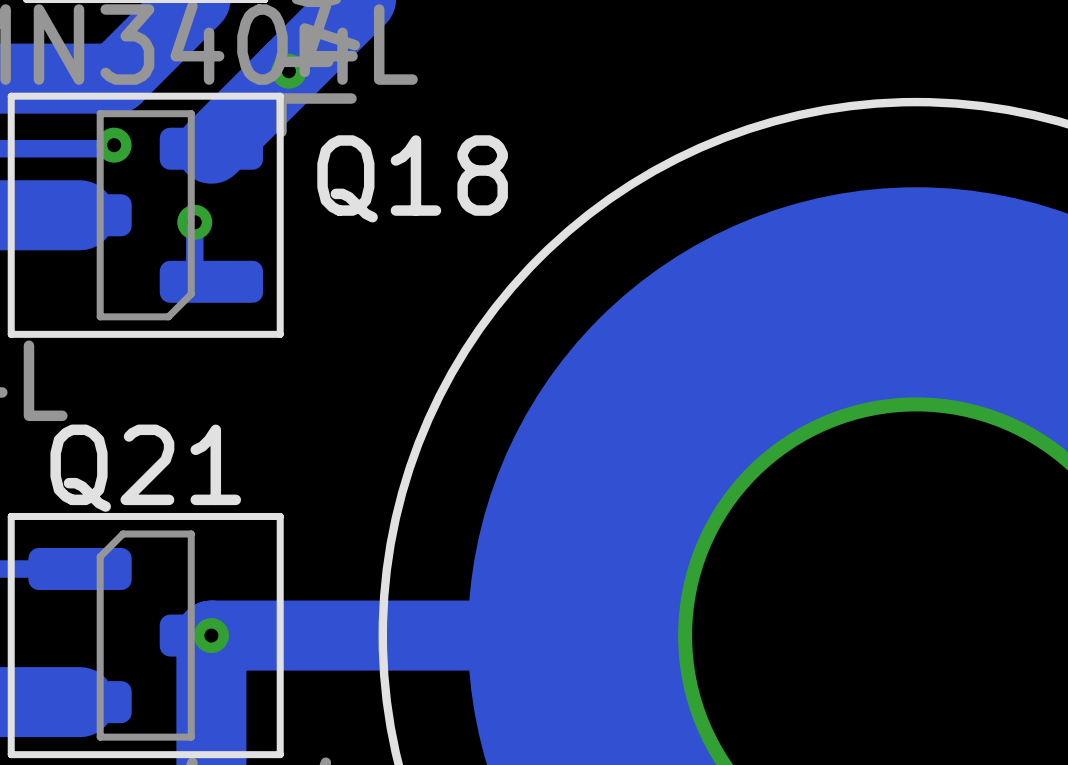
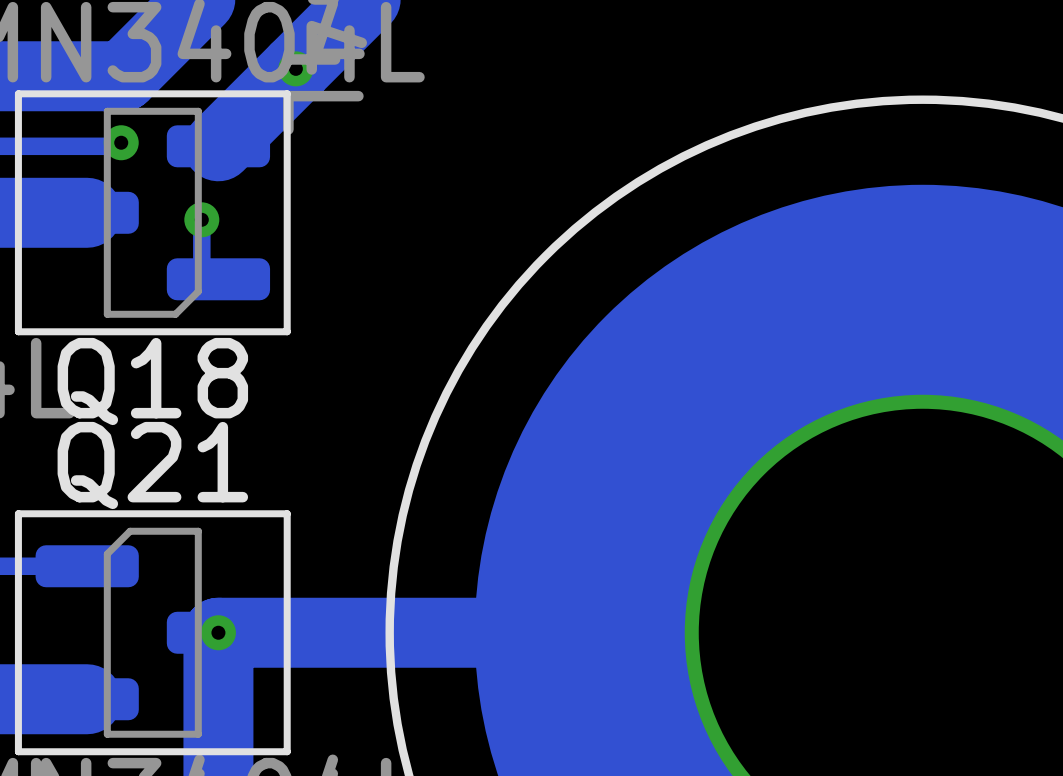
Q18 name position: Q18 (412, 178) -> Q18 (152, 381)

